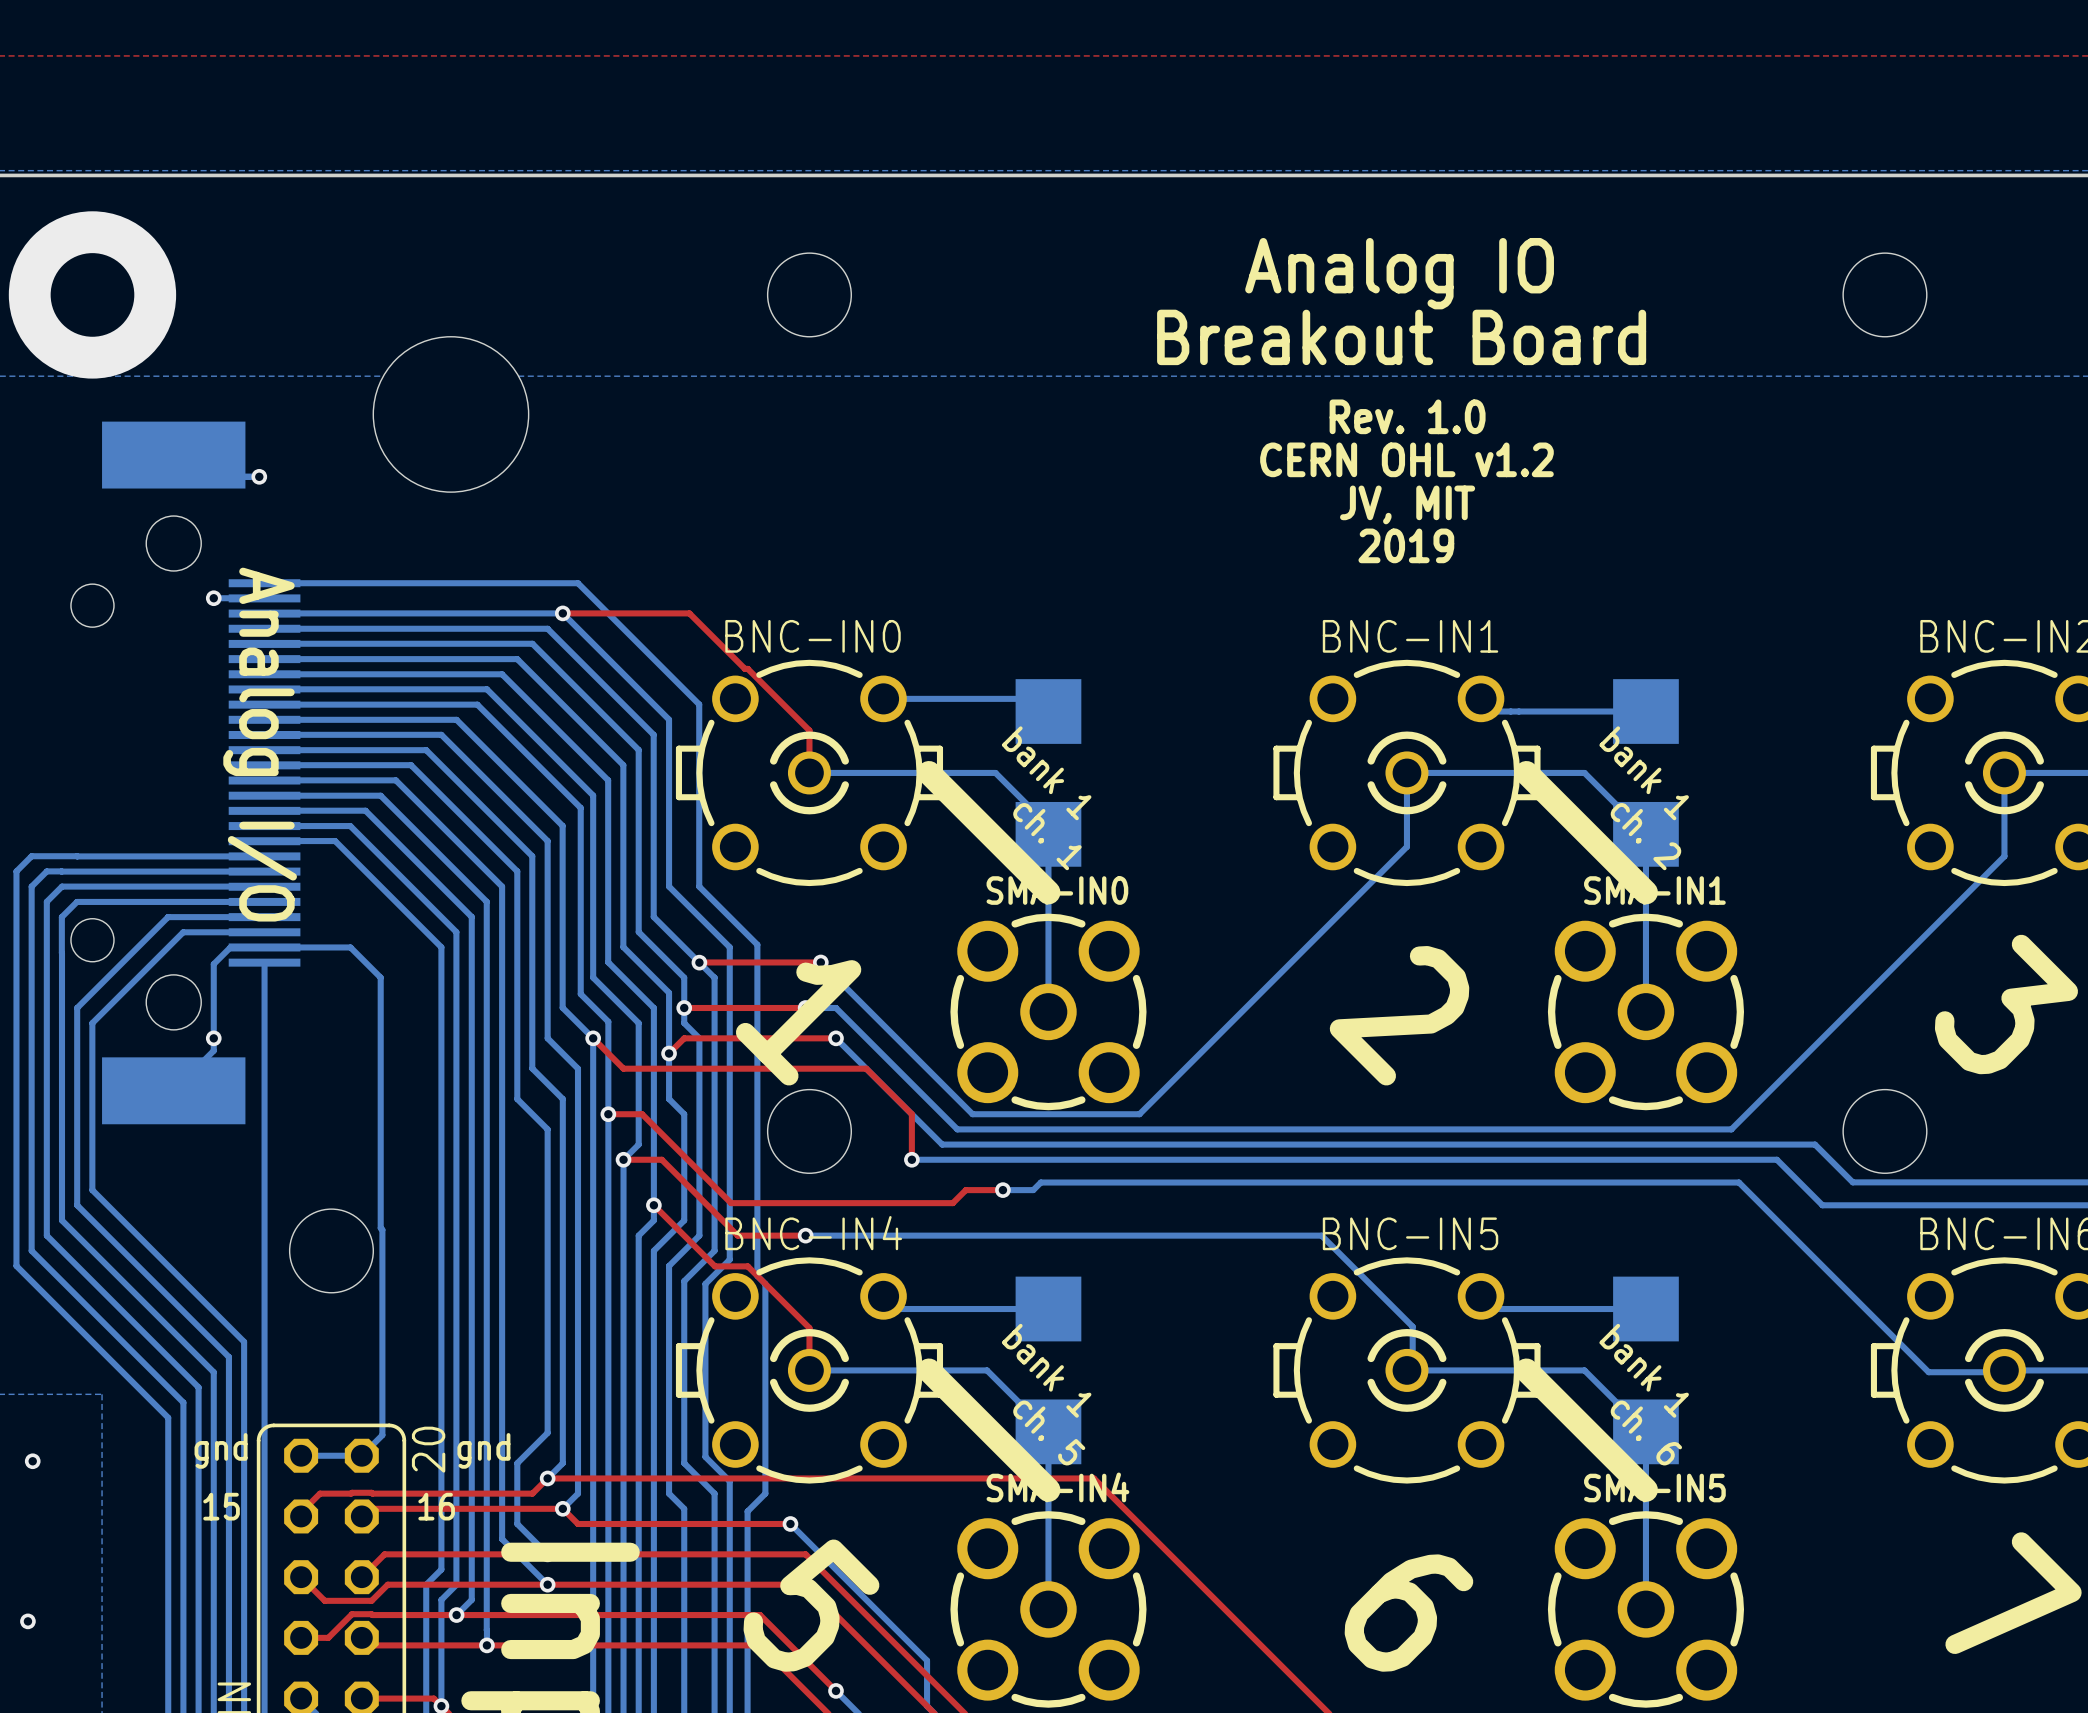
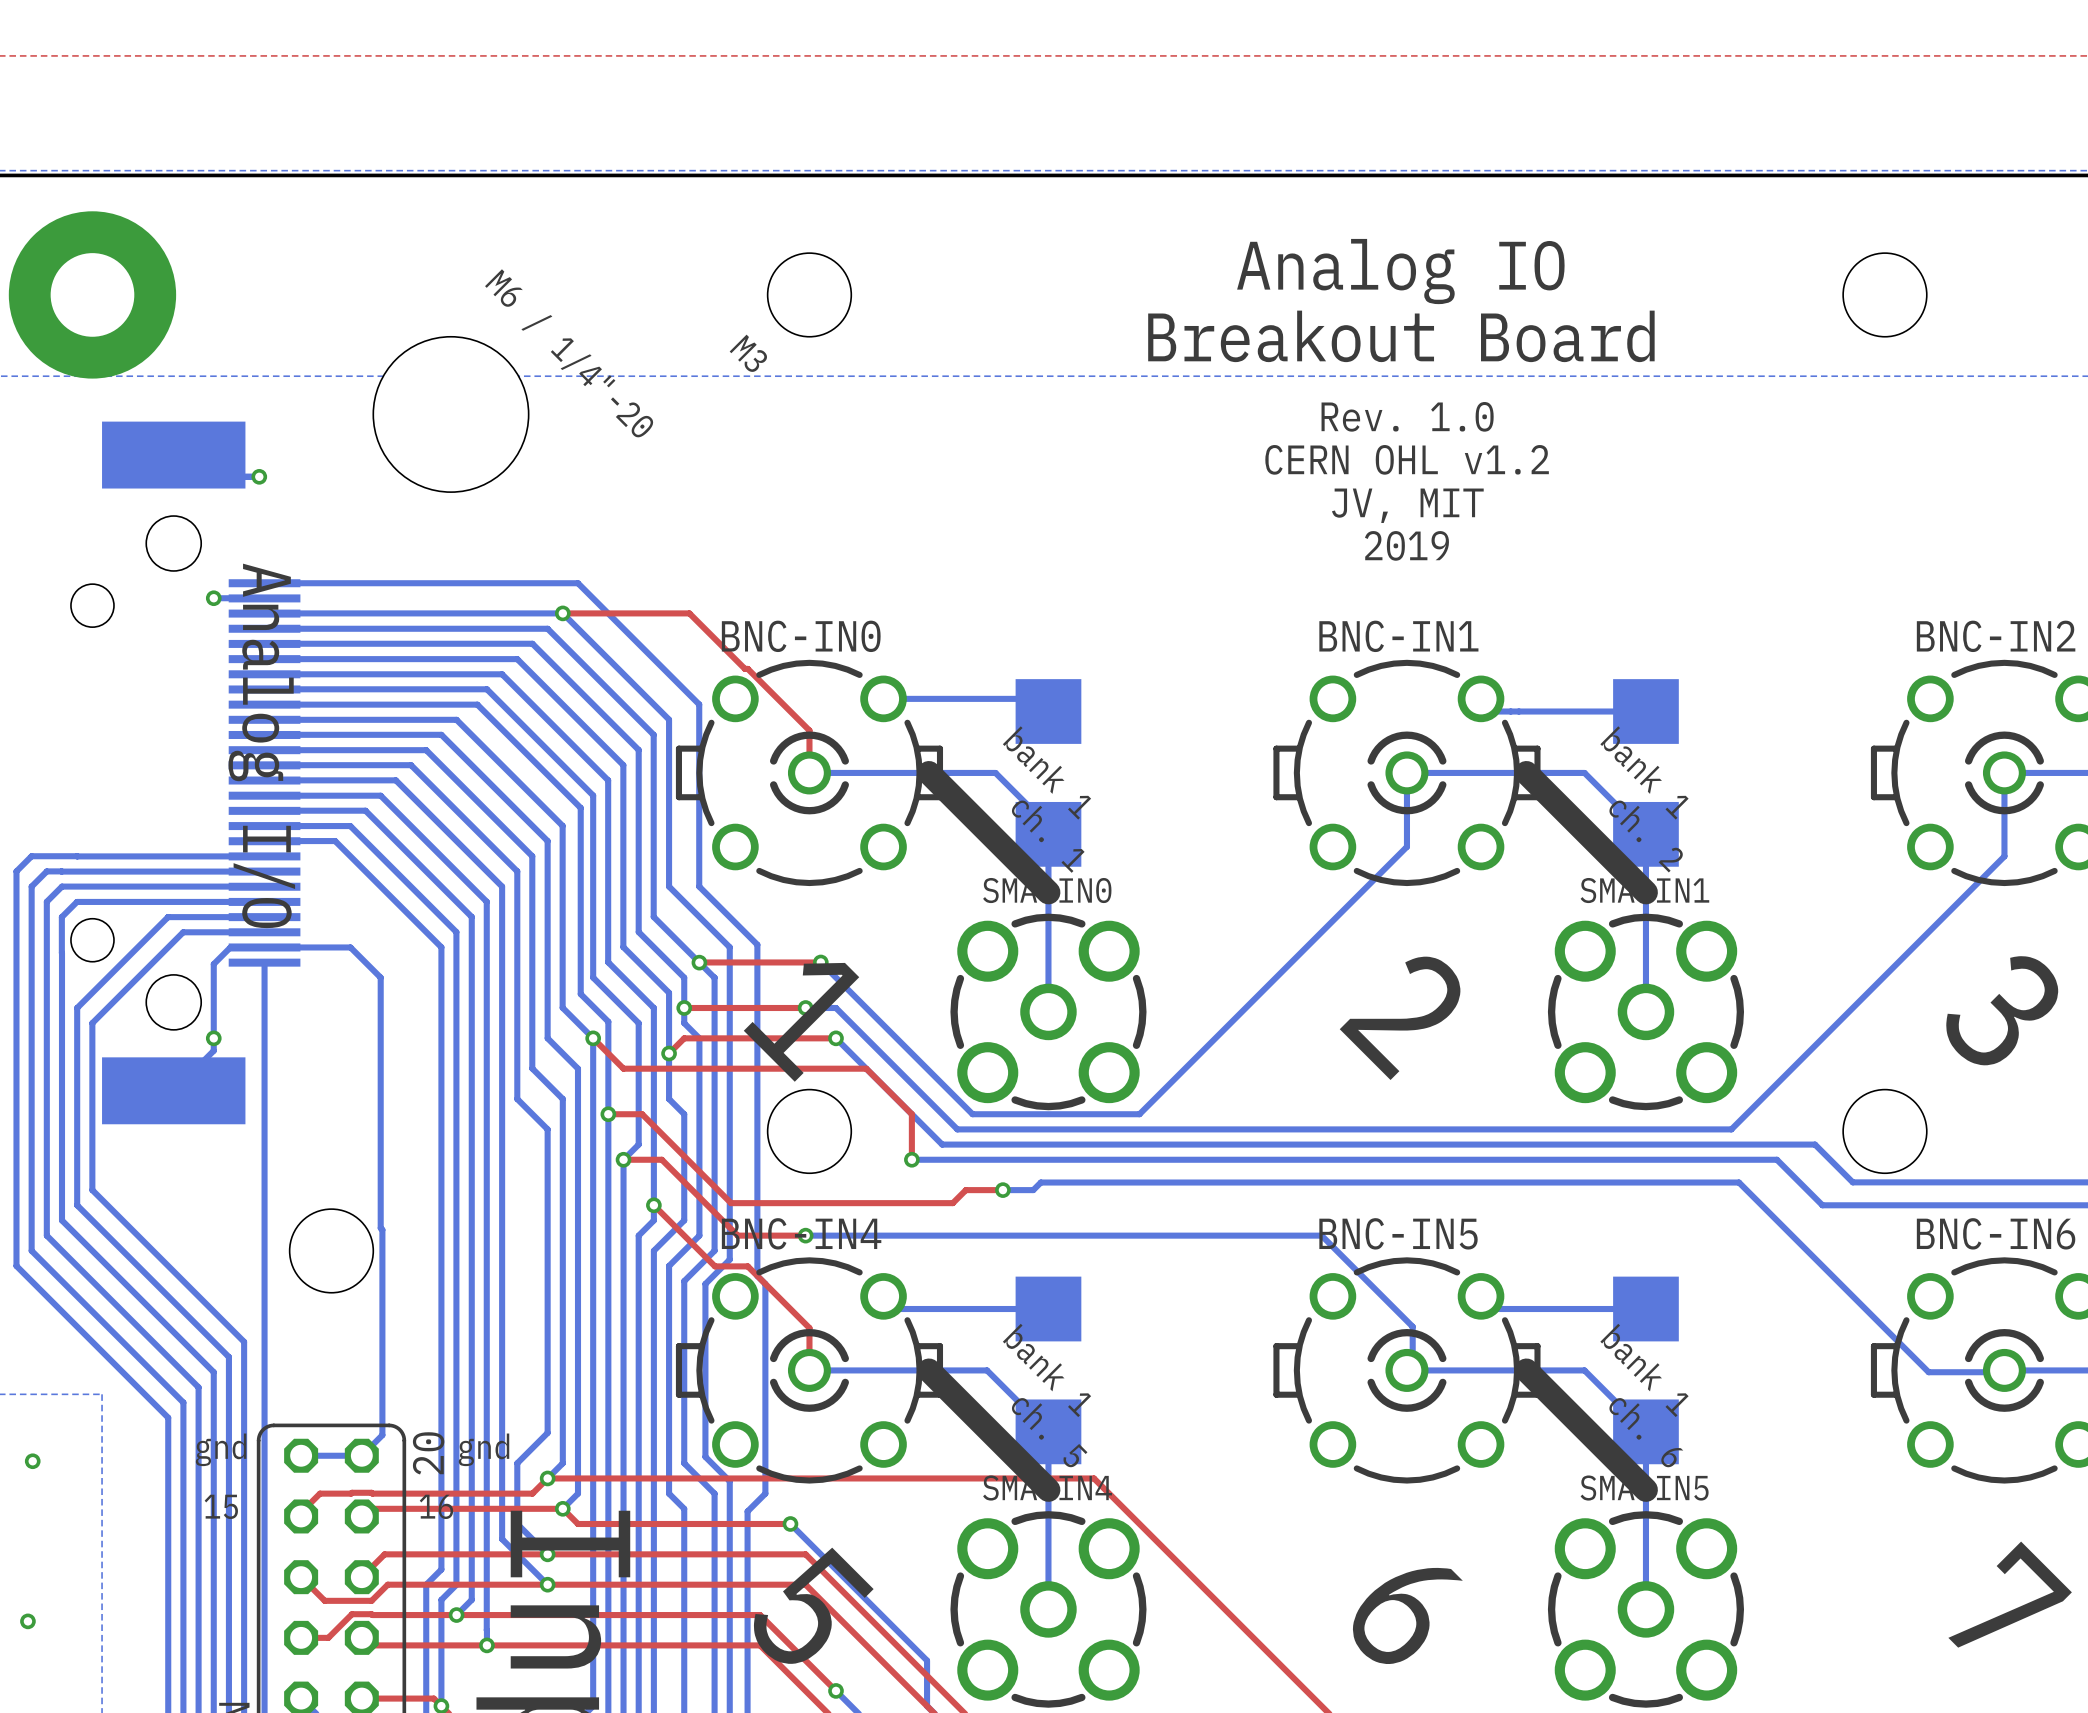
text: none -> M6 / 1/4"-20 (569, 353)
text: none -> M3 (748, 353)

